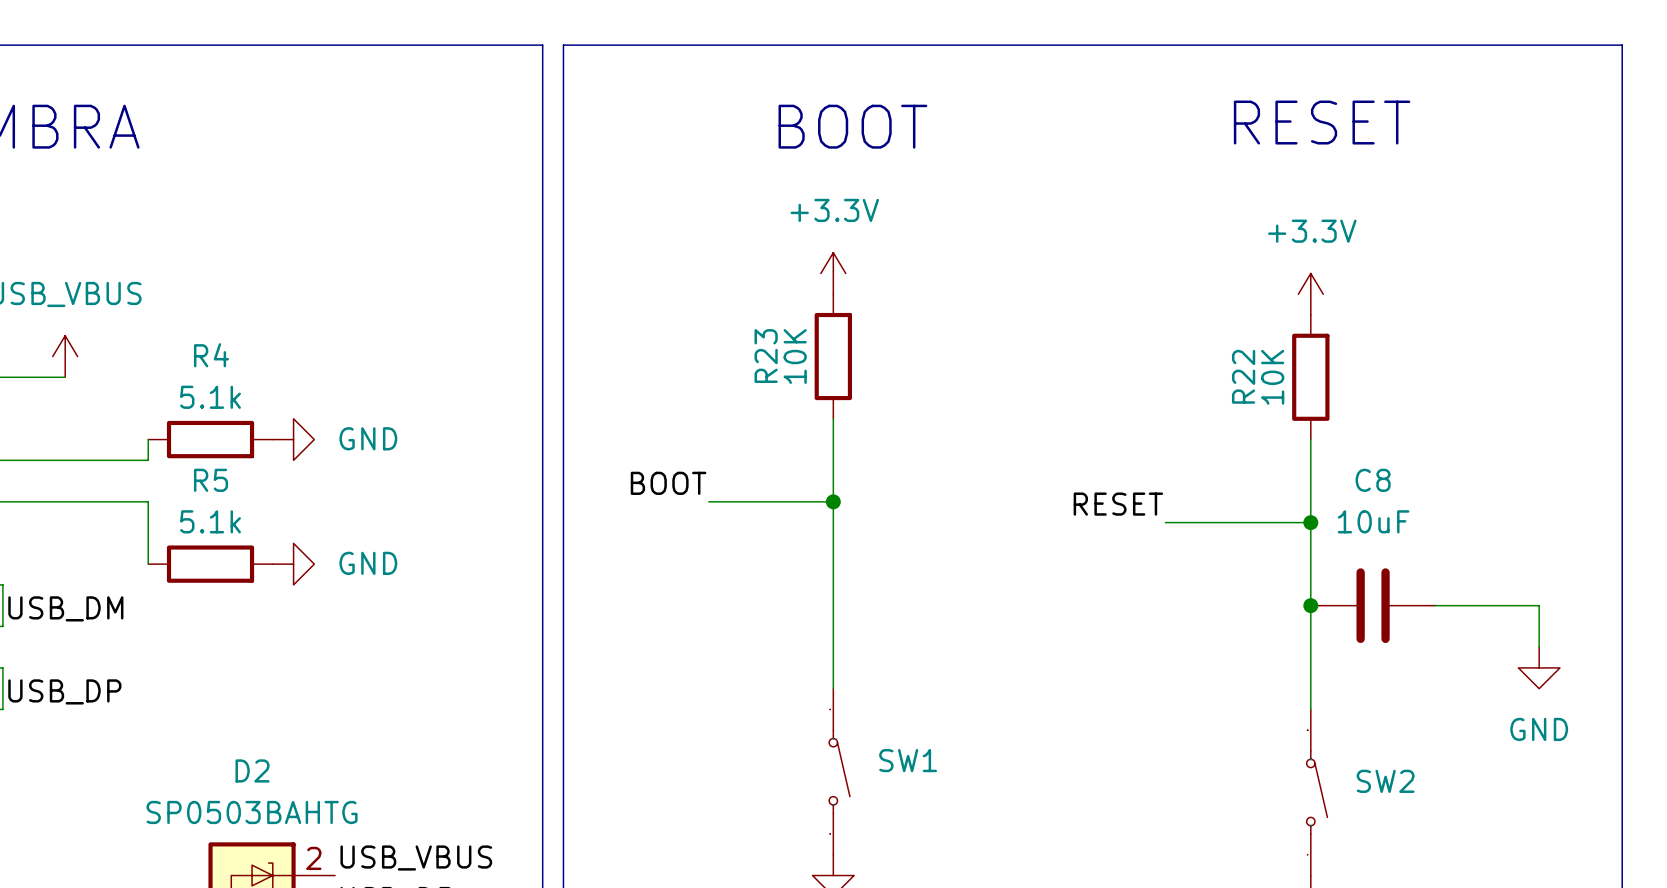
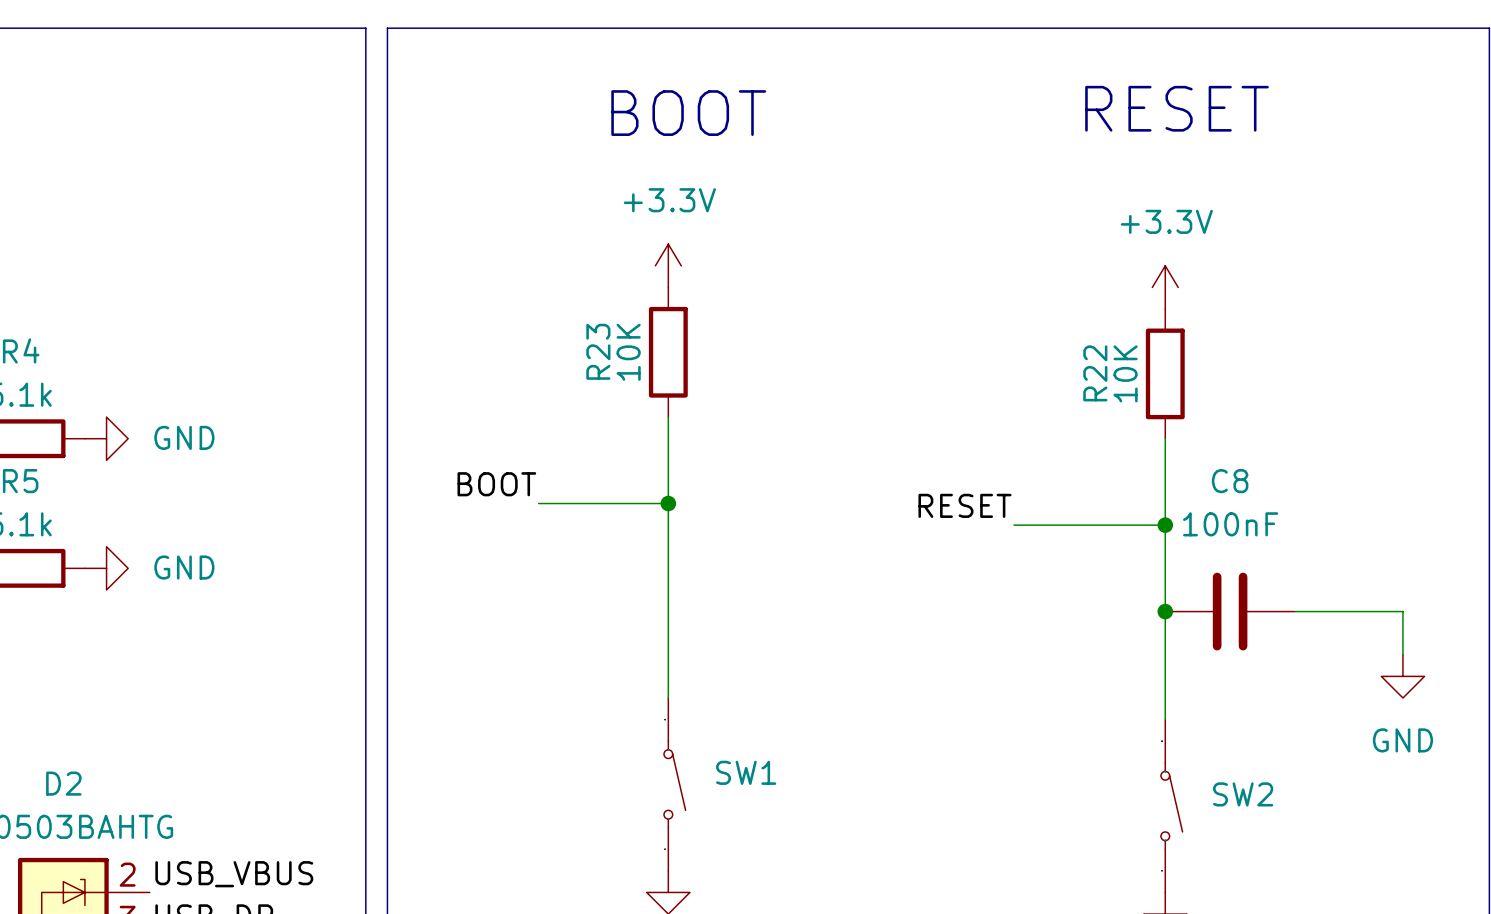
C8 value: 10uF (1373, 521) -> 100nF (1230, 524)

